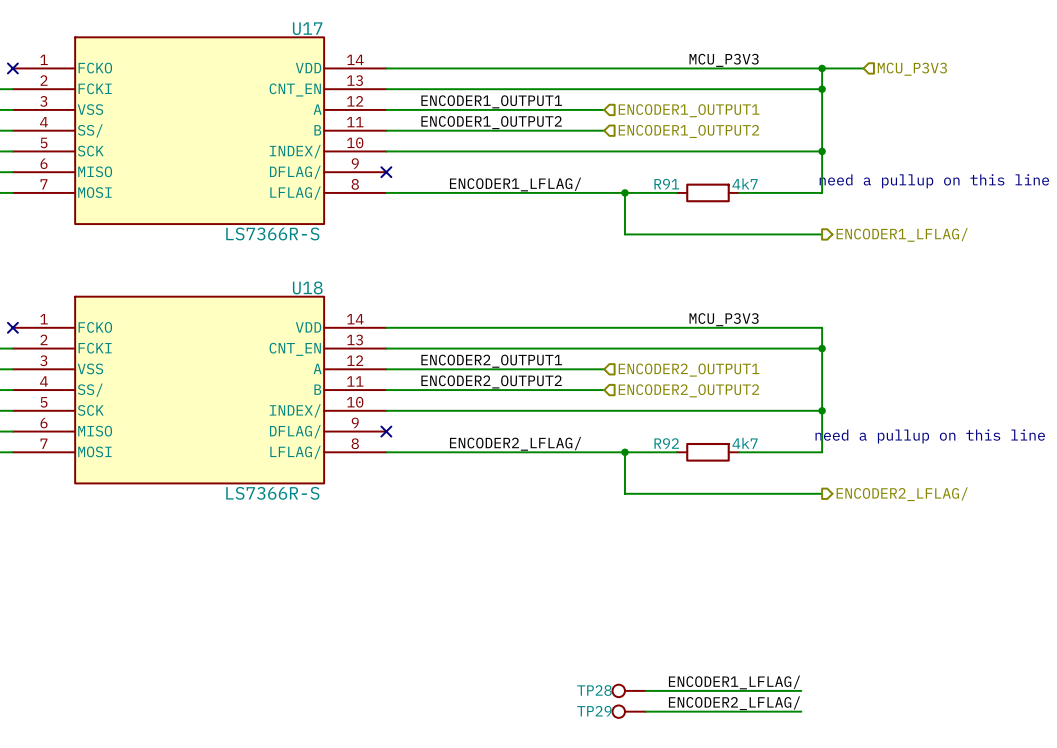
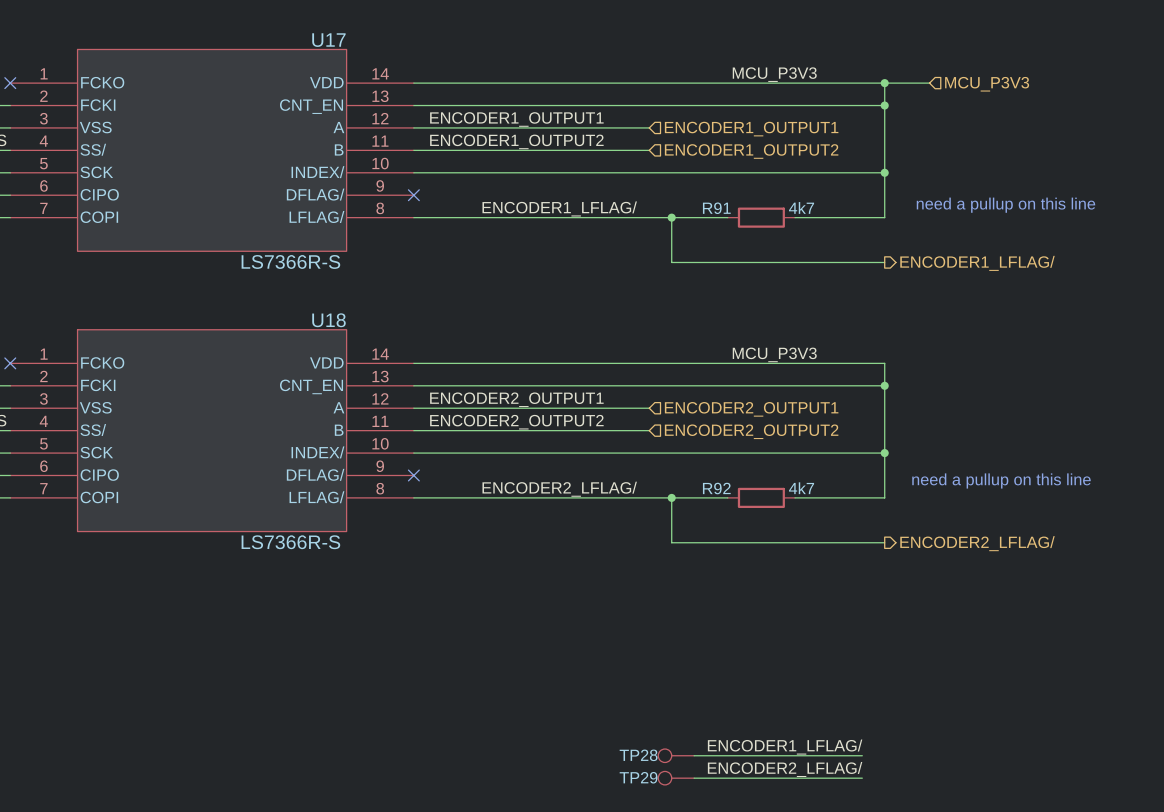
U17 pin name: MISO (95, 171) -> CIPO (99, 194)
U17 pin name: MOSI (94, 192) -> COPI (99, 217)
U18 pin name: MISO (95, 431) -> CIPO (99, 475)
U18 pin name: MOSI (94, 451) -> COPI (99, 497)

